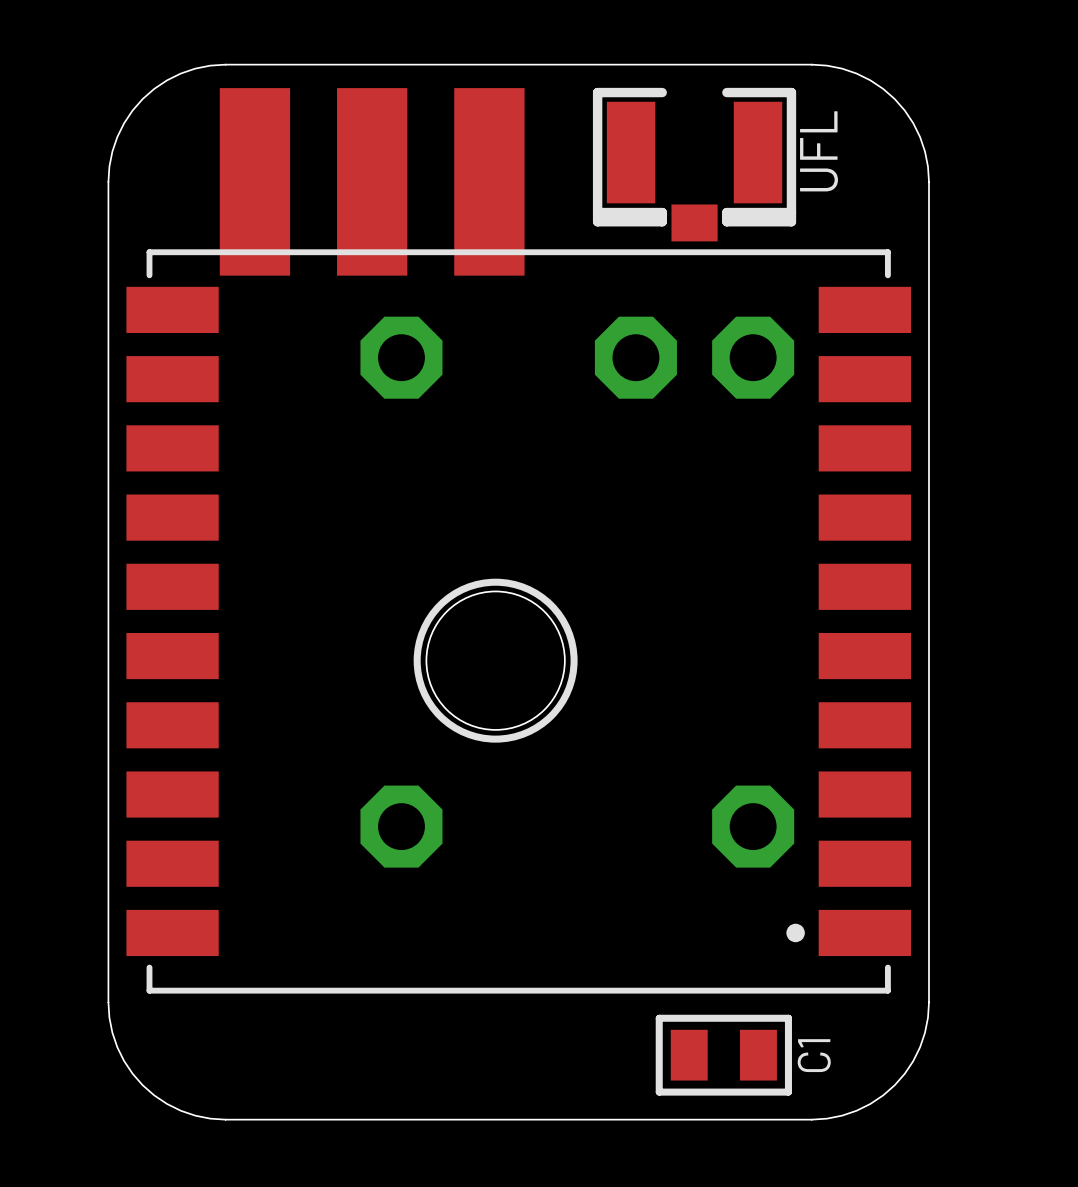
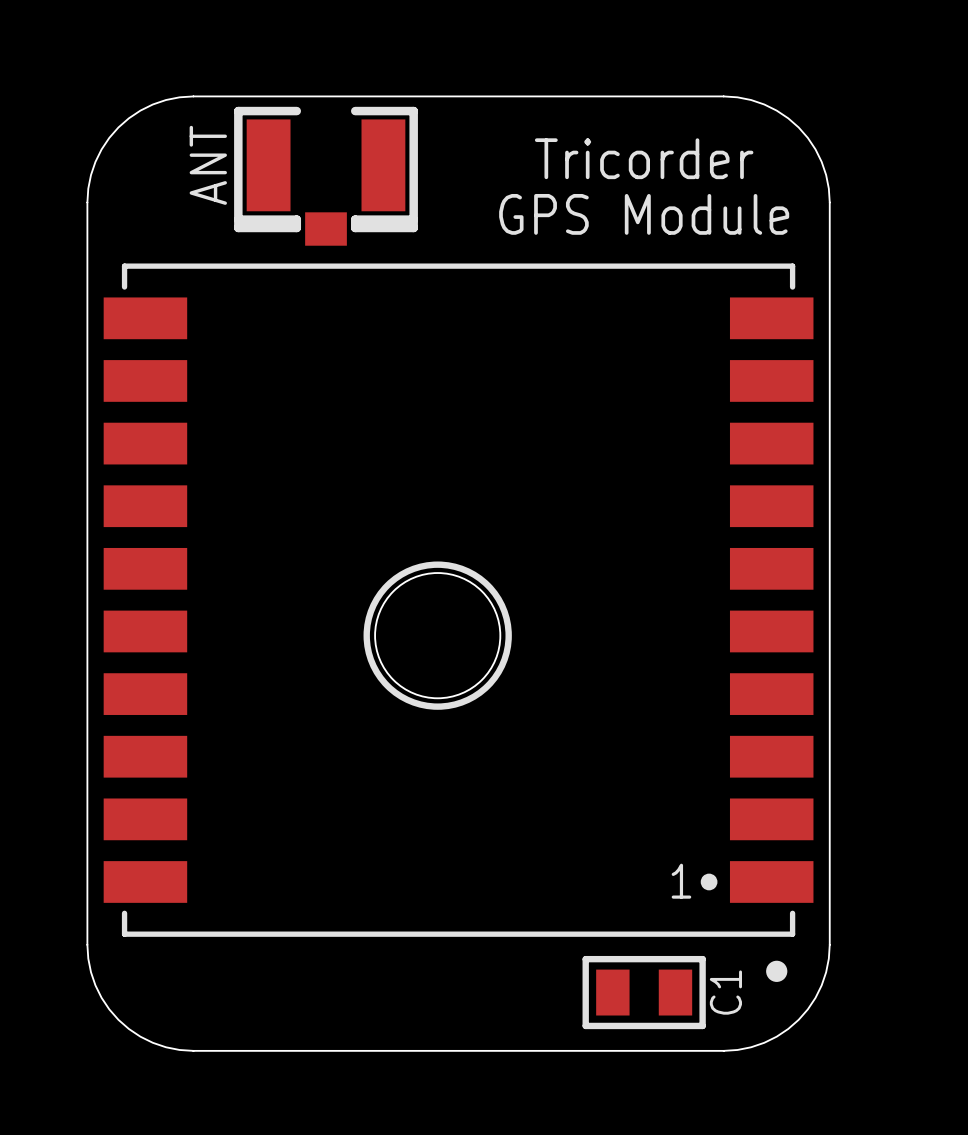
text: none -> Tricorder (644, 158)
ANT: none -> (326, 176)
UFL: (694, 164) -> none
part: (372, 181) -> none
text: none -> GPS Module (644, 214)
part: (401, 357) -> none
part: (635, 357) -> none
part: (753, 357) -> none
part: (401, 826) -> none
part: (753, 826) -> none
text: none -> 1 (681, 881)
drawing: none -> [766, 960, 788, 982]

